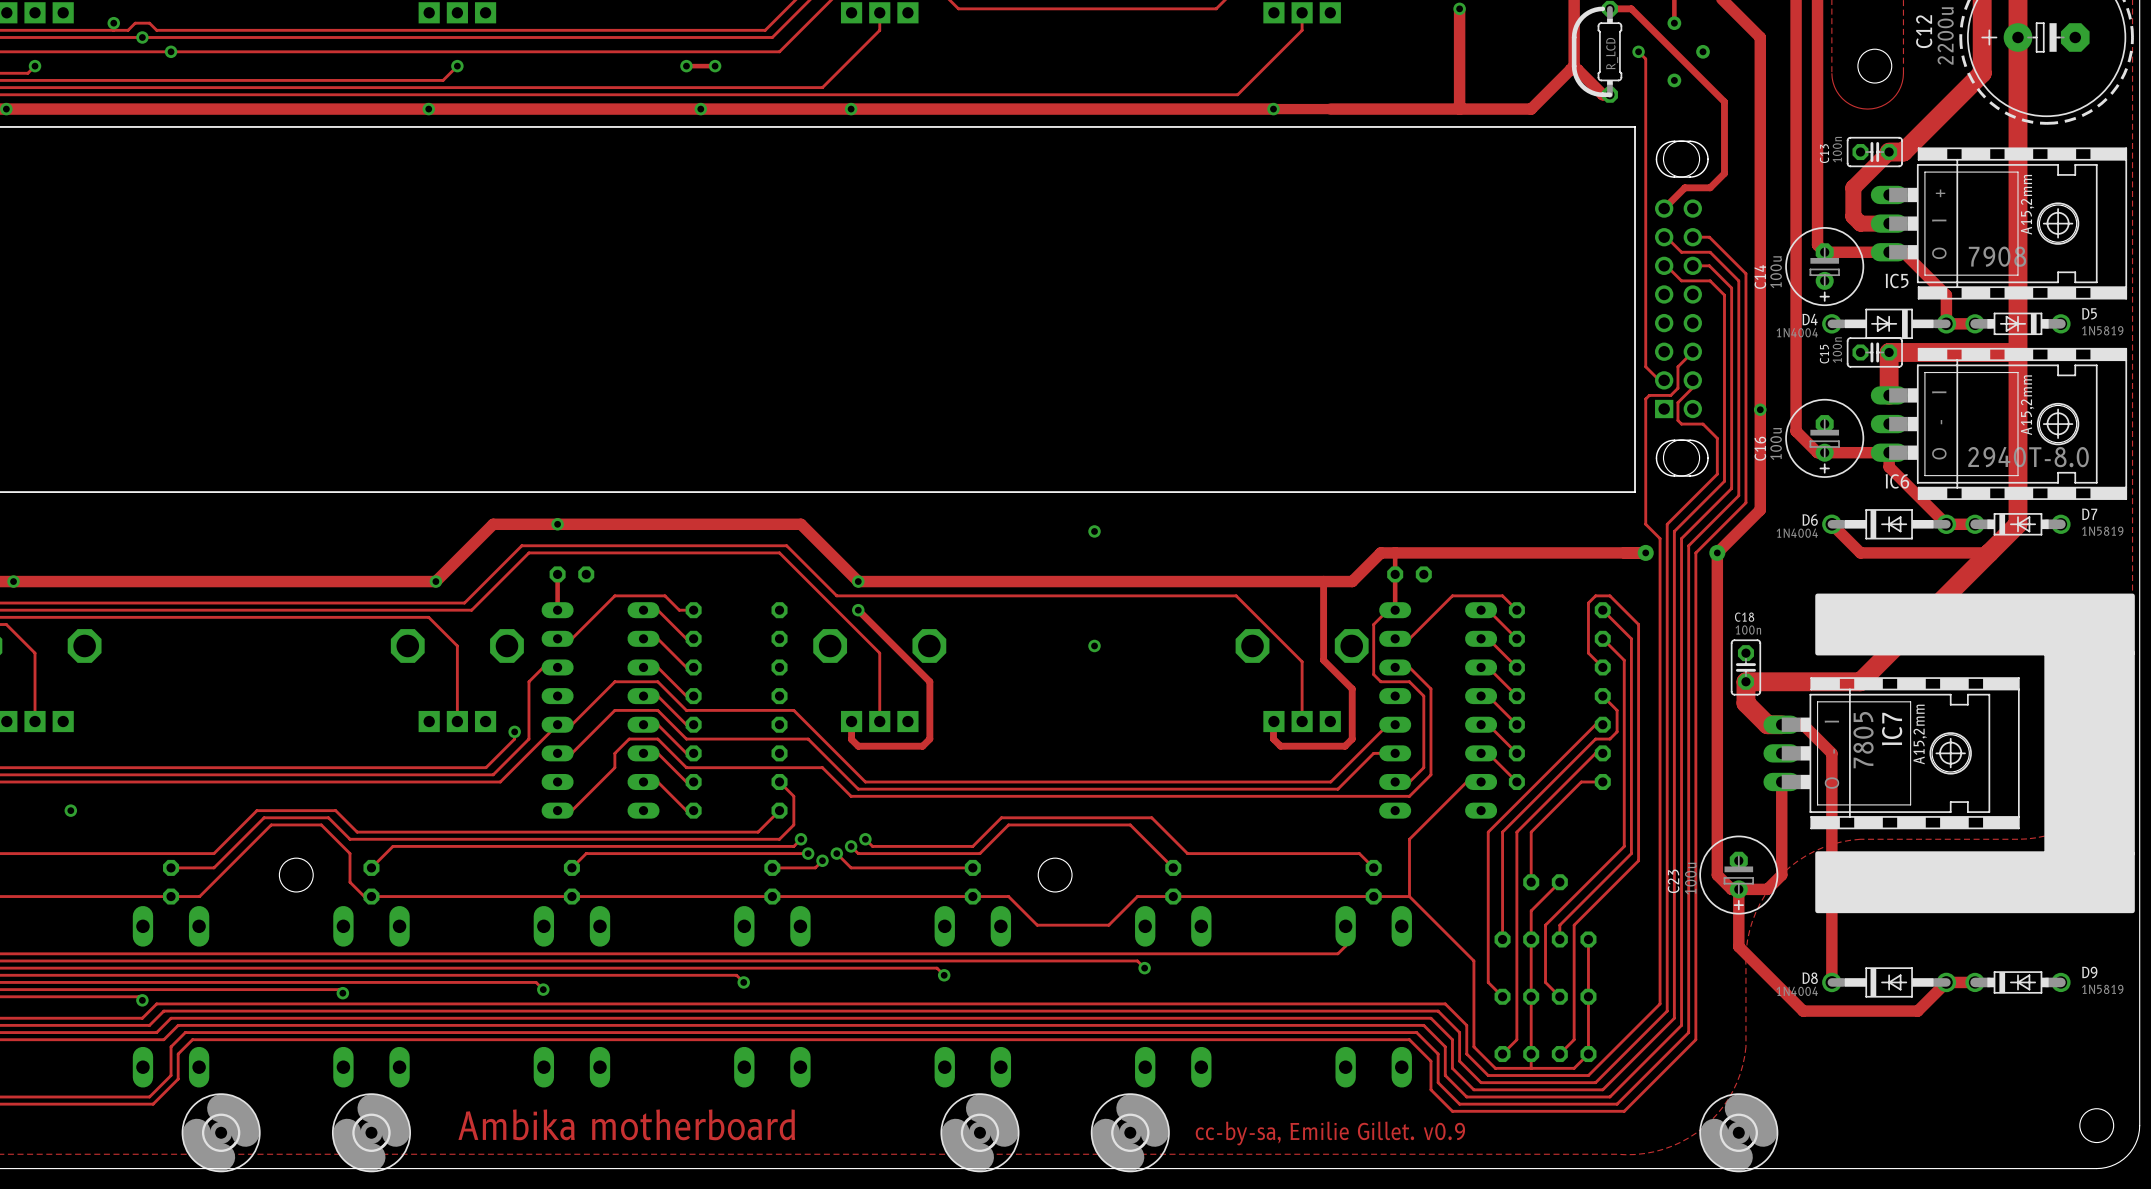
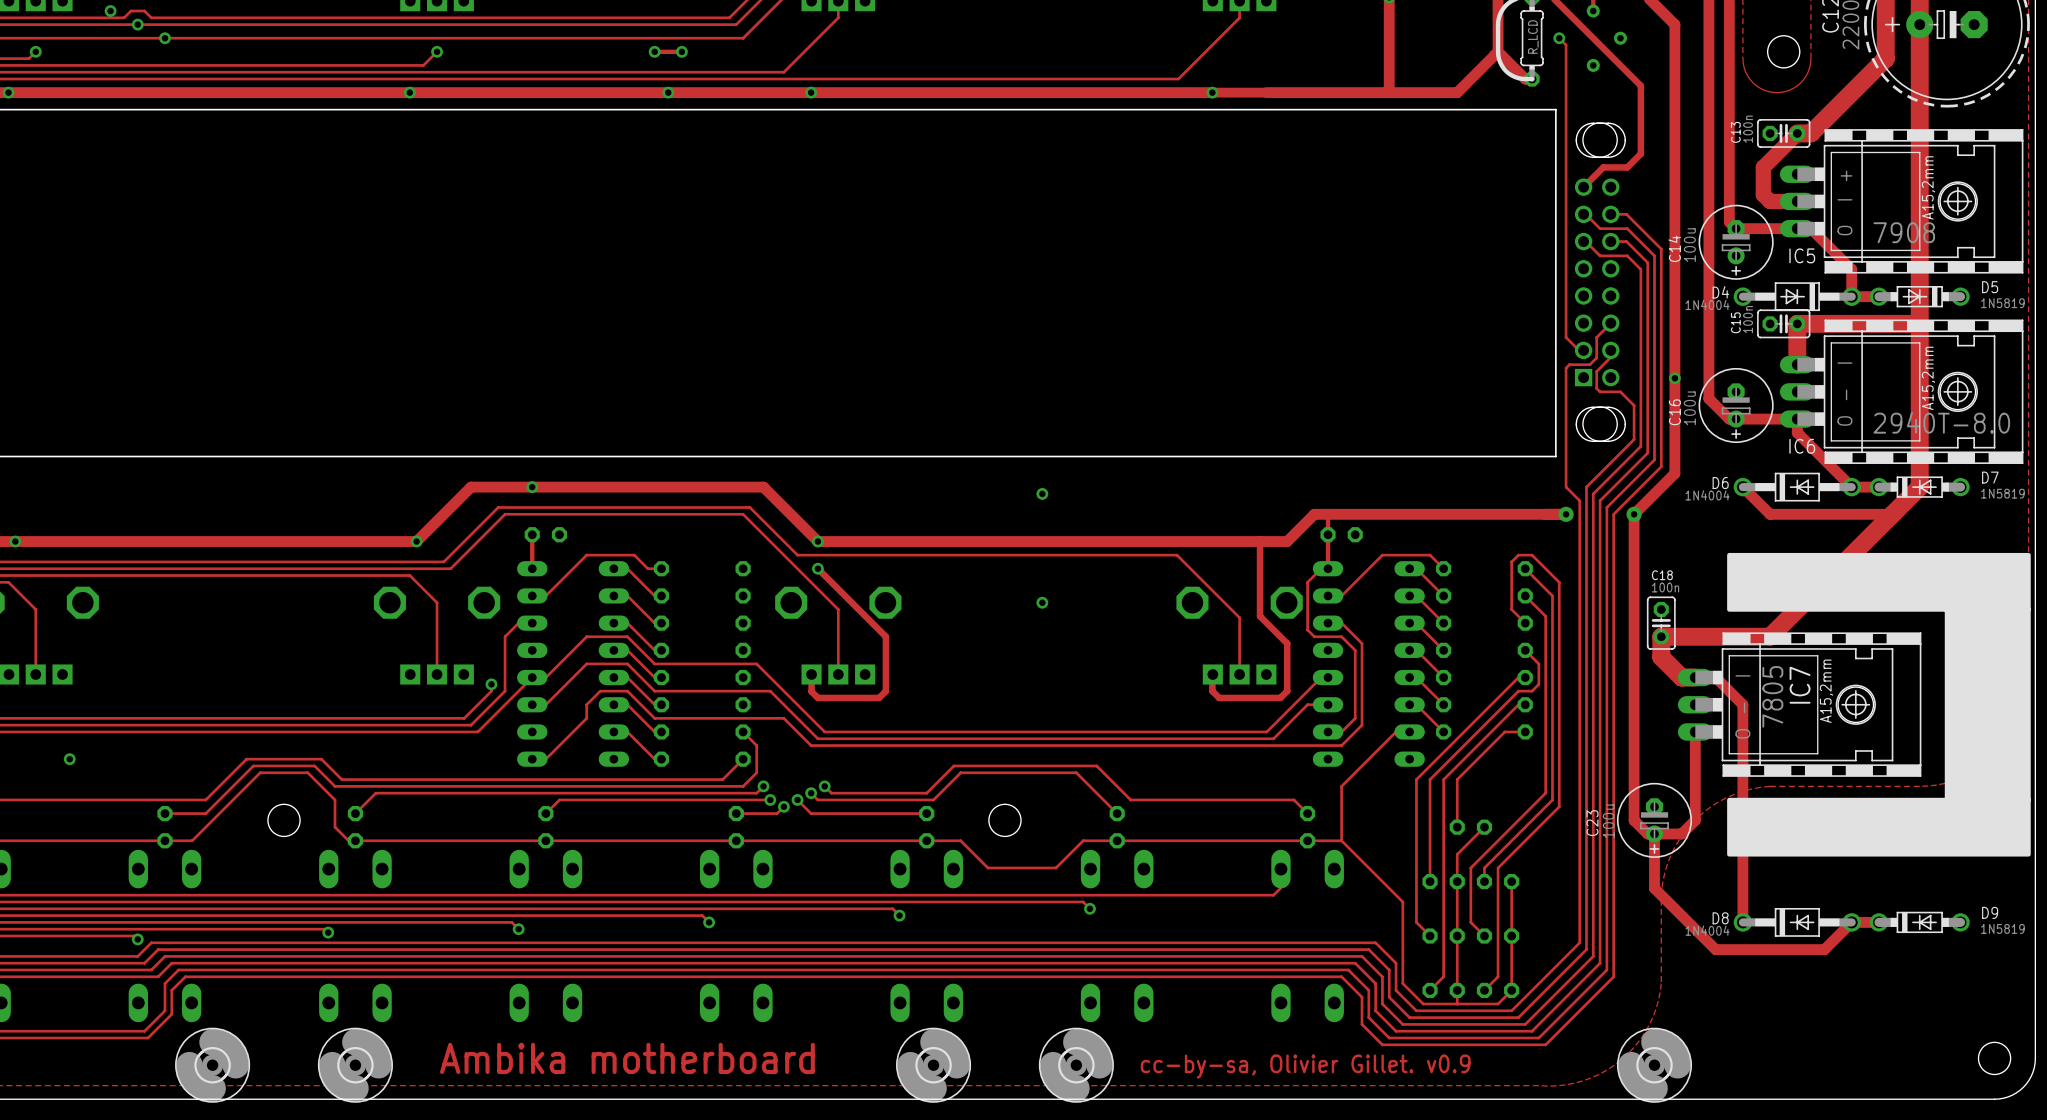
text: cc-by-sa, Emilie Gillet. v0.9 (1330, 1133) -> cc-by-sa, Olivier Gillet. v0.9 (1305, 1066)

